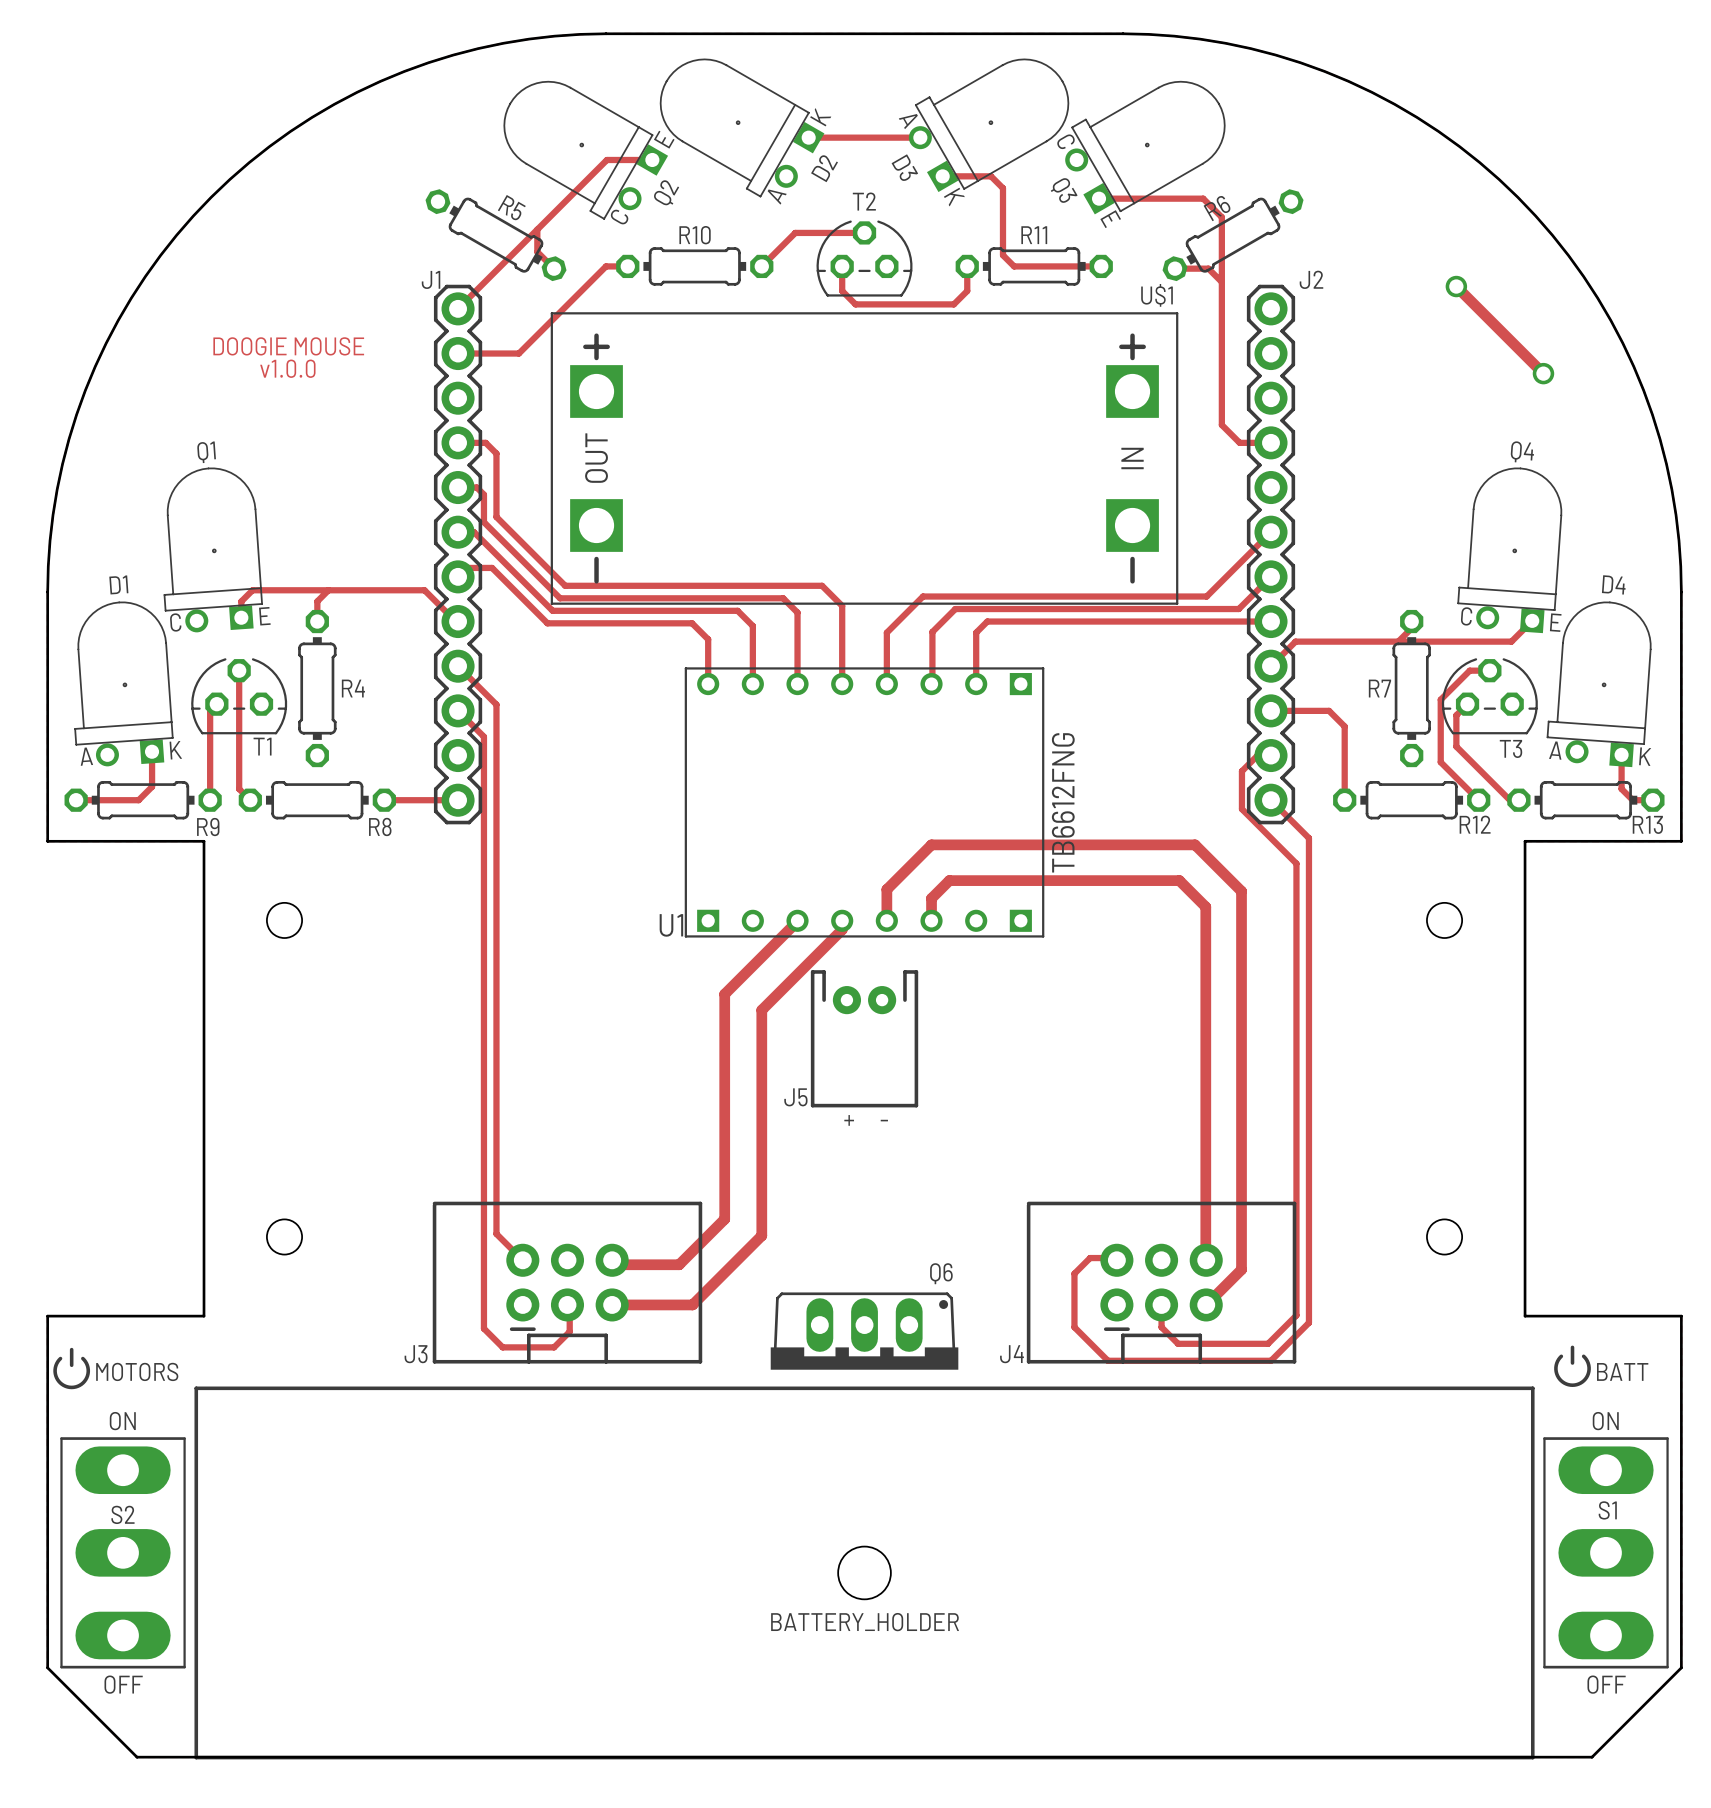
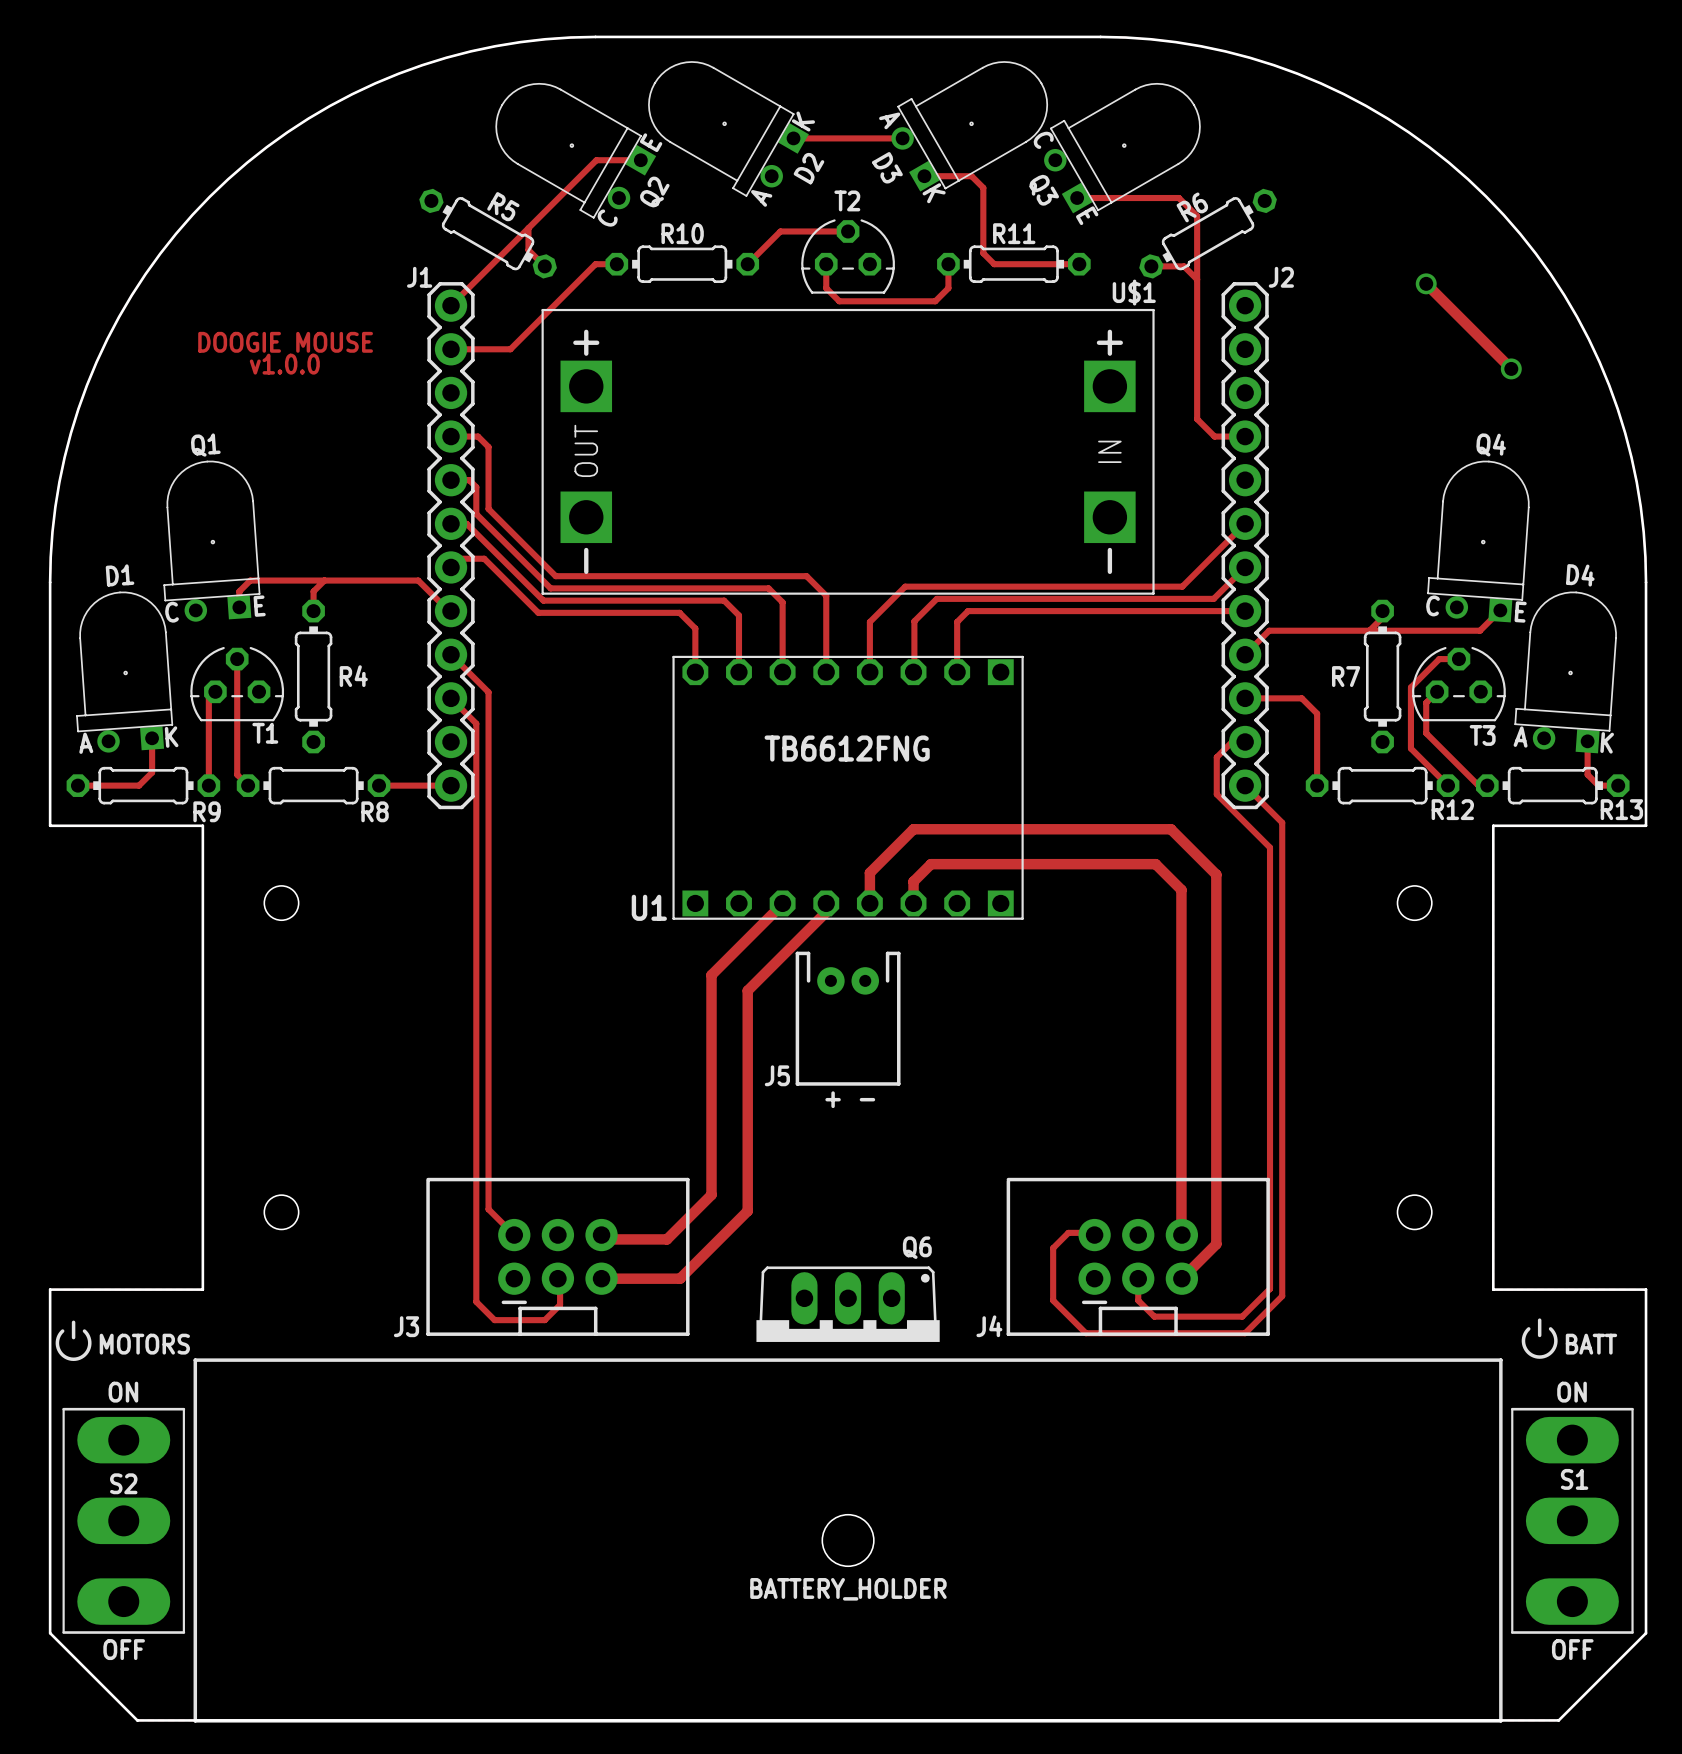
U1 footprint: [684, 667, 1045, 938] -> [672, 655, 1024, 920]
U1 value: none -> TB6612FNG (847, 748)

